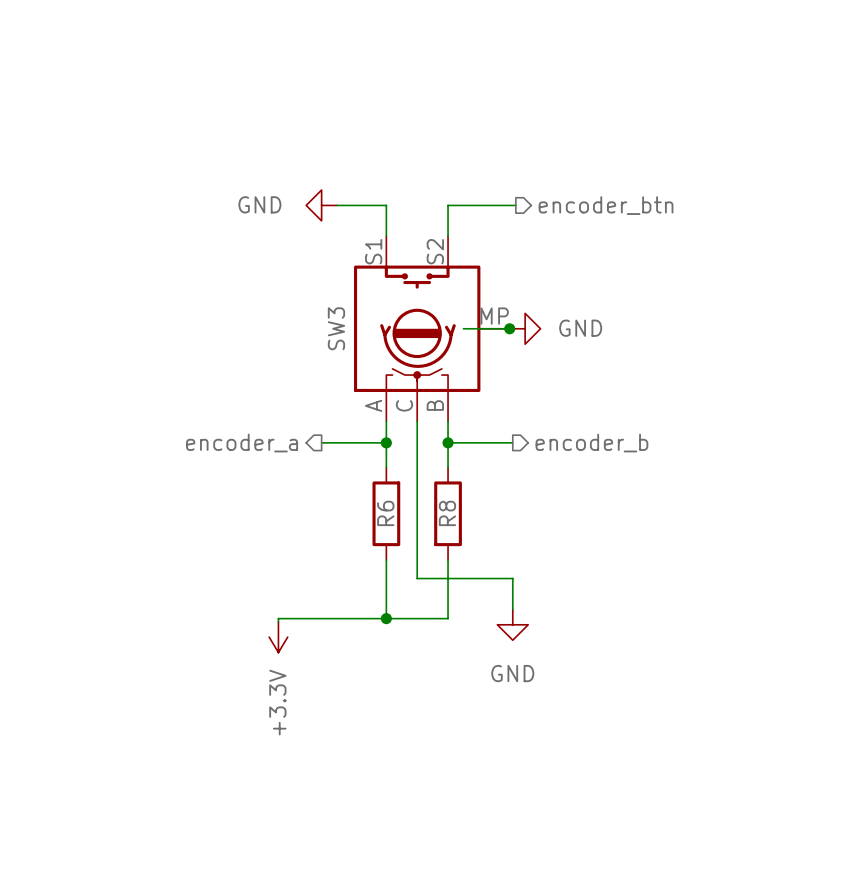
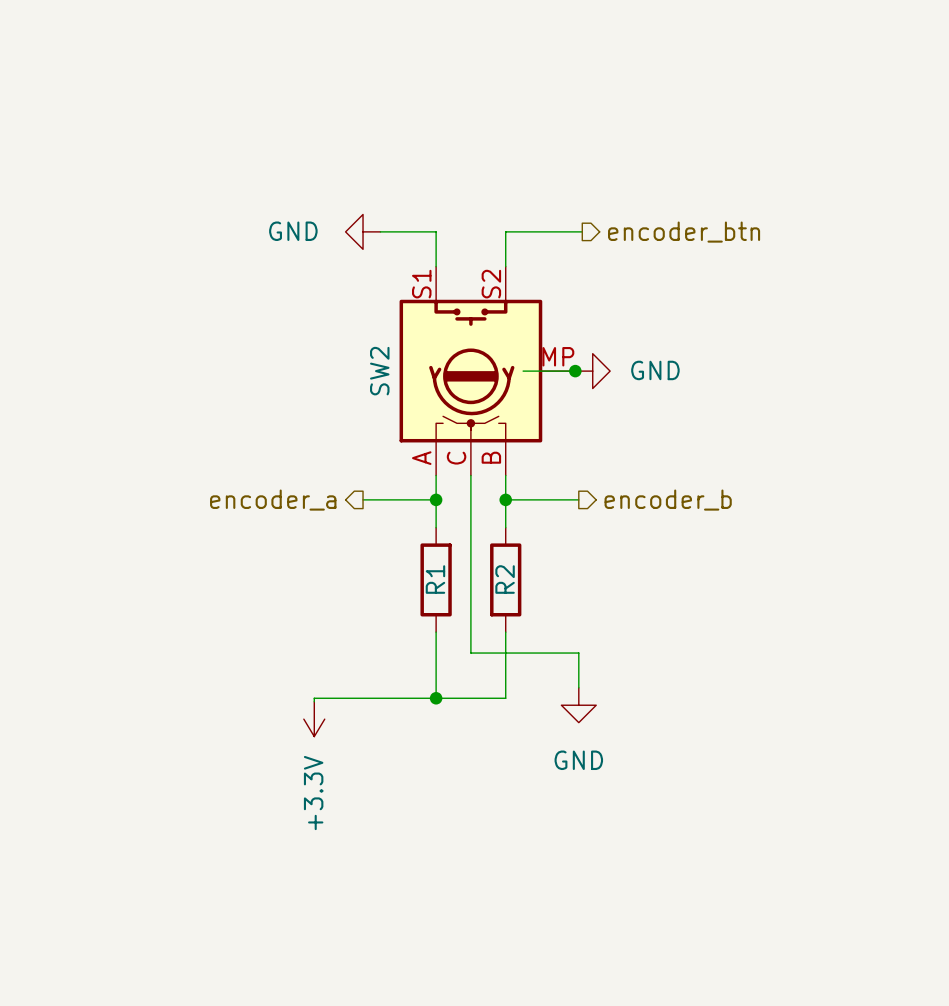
SW3 name: SW3 (336, 328) -> SW2 (379, 371)
R6 name: R6 (385, 513) -> R1 (435, 579)
R8 name: R8 (447, 513) -> R2 (505, 579)

